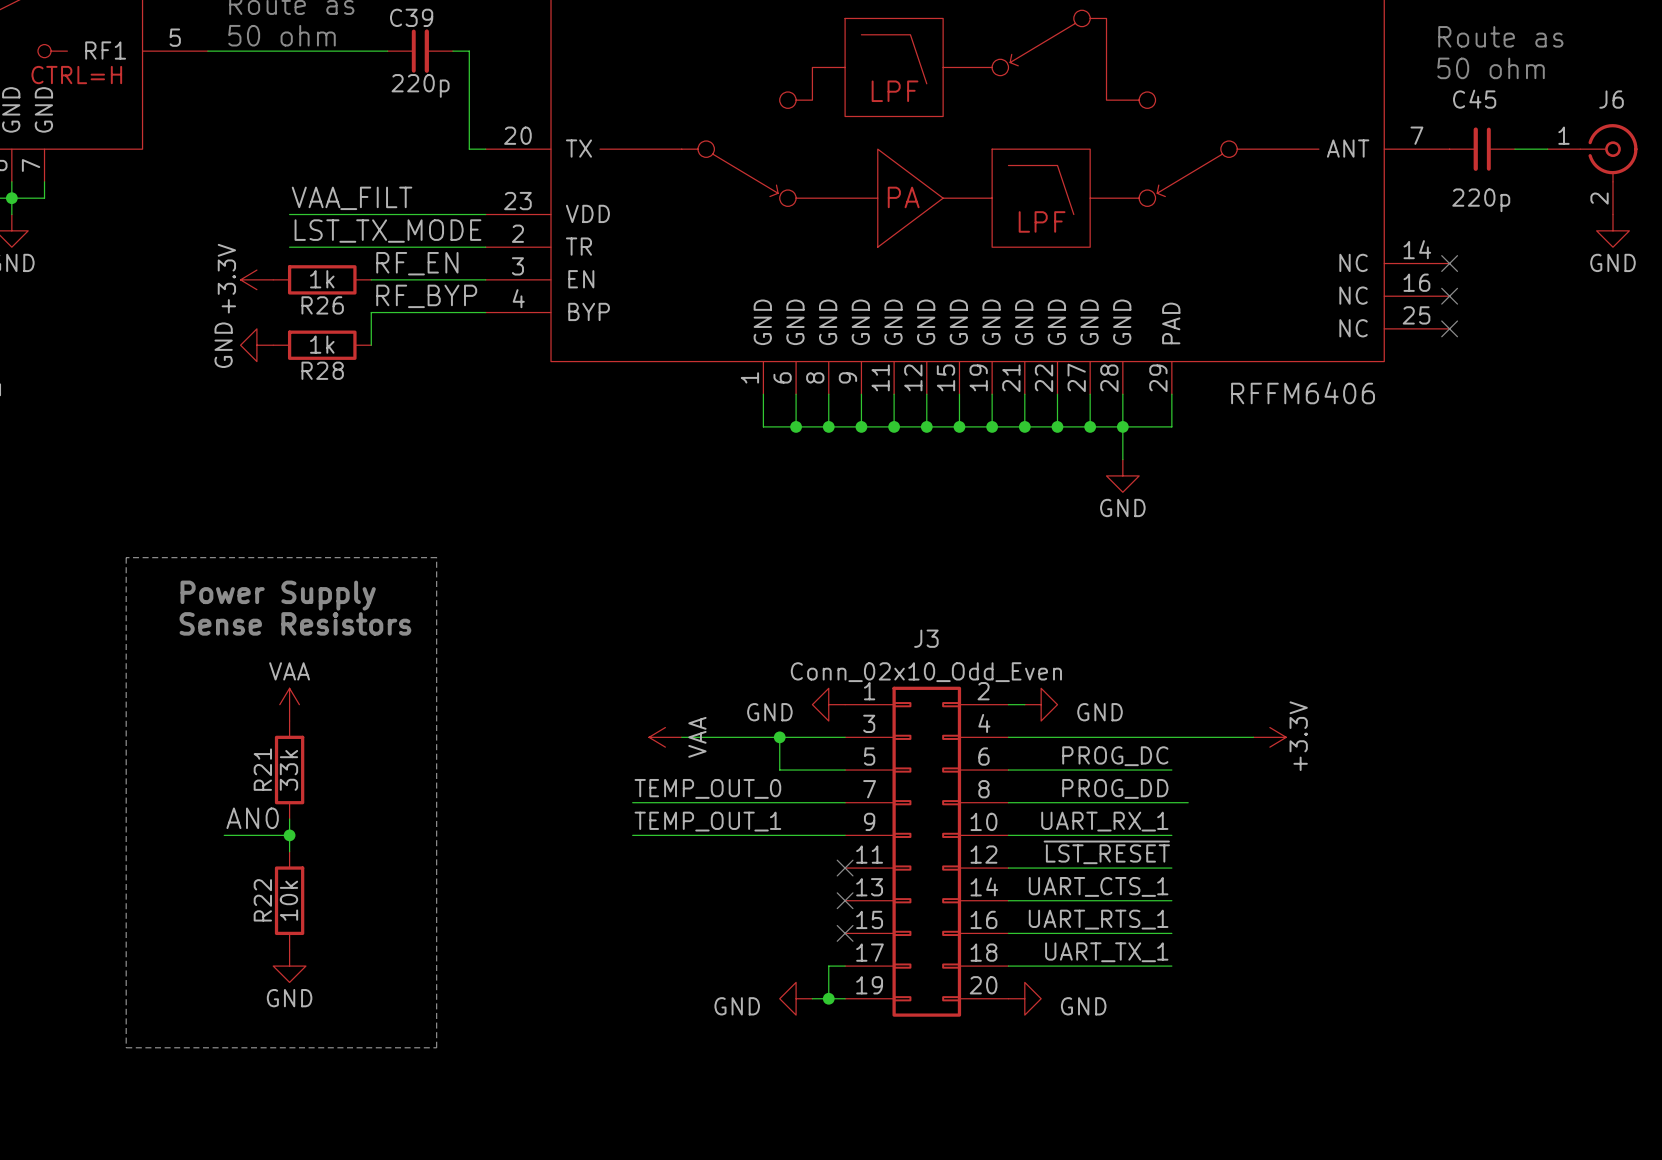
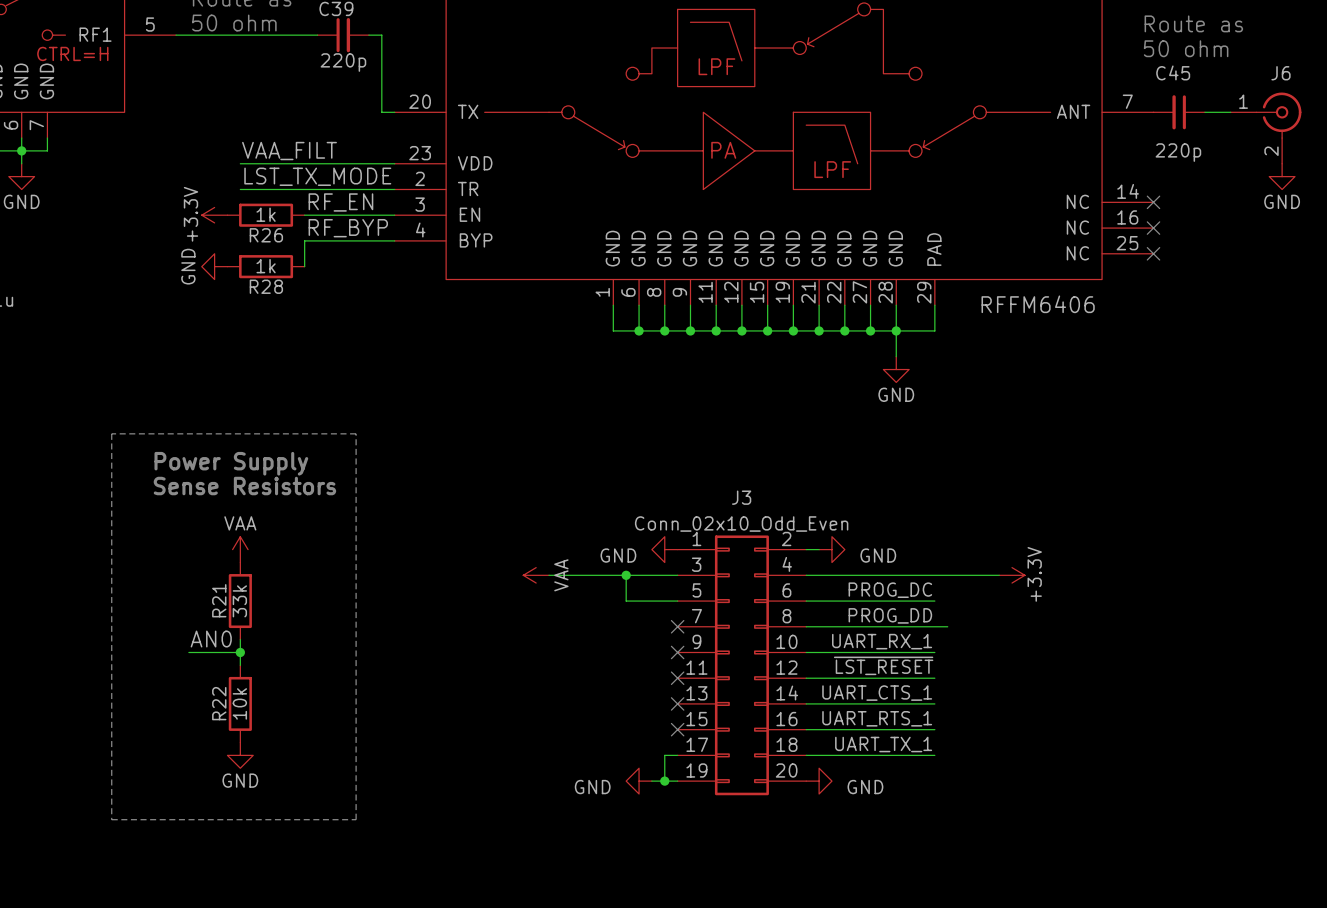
label: TEMP_OUT_0 (707, 788) -> none
wire: (632, 802) (845, 802) -> none
no-connect mark: none -> (677, 626)
label: TEMP_OUT_1 (707, 821) -> none
wire: (632, 835) (845, 835) -> none
no-connect mark: none -> (677, 652)

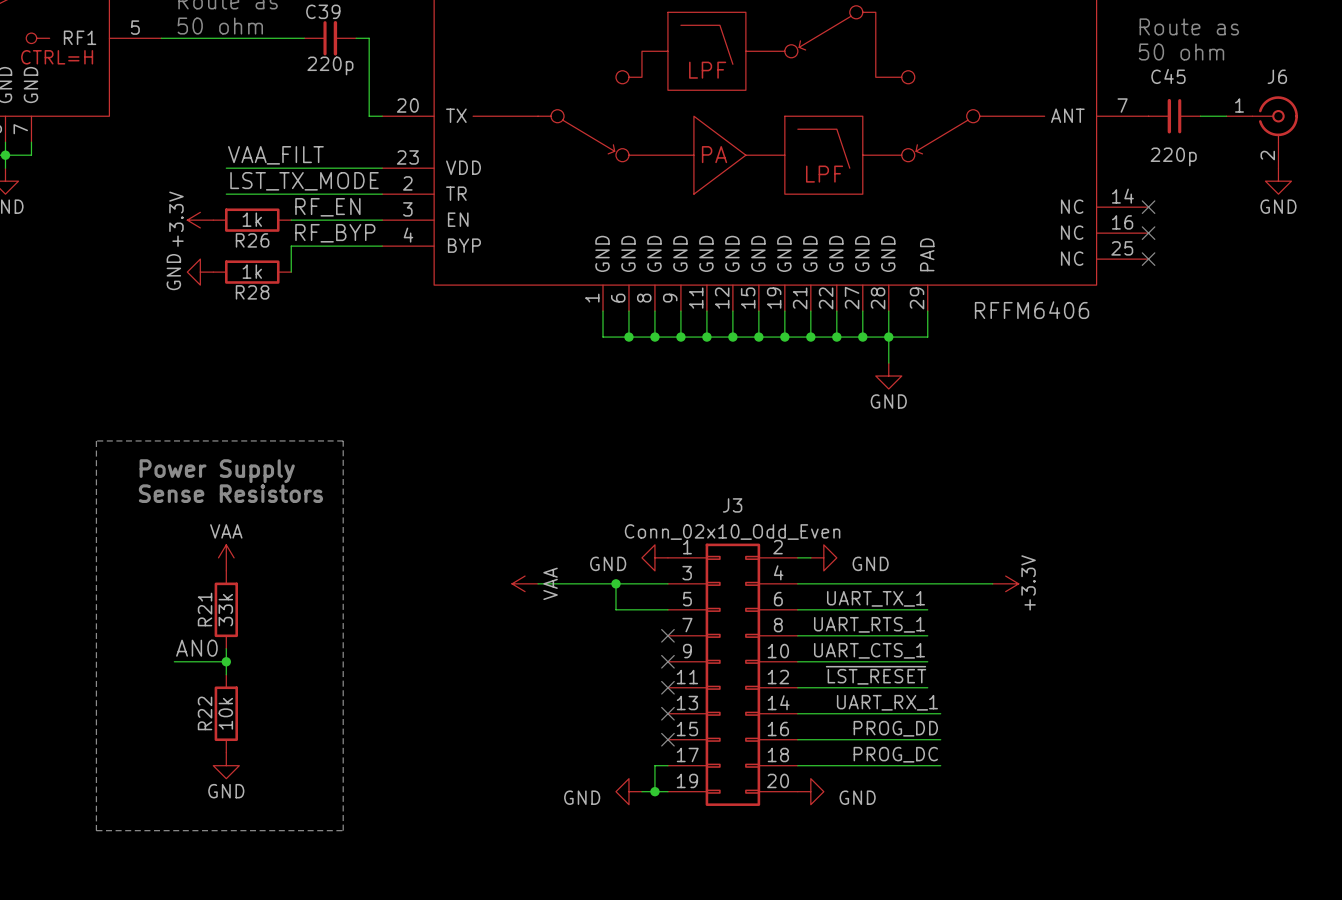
label: PROG_DC (890, 590) -> UART_TX_1 (875, 598)
label: PROG_DD (890, 615) -> UART_RTS_1 (869, 624)
wire: (934, 626) (947, 626) -> (927, 713) (940, 713)
label: UART_RX_1 (882, 641) -> UART_CTS_1 (869, 650)
label: UART_CTS_1 (877, 693) -> UART_RX_1 (887, 702)
label: UART_RTS_1 (877, 718) -> none
label: none -> PROG_DD (895, 728)
wire: none -> (927, 739) (940, 739)
label: UART_TX_1 (883, 744) -> none
label: none -> PROG_DC (895, 754)
wire: none -> (927, 765) (940, 765)

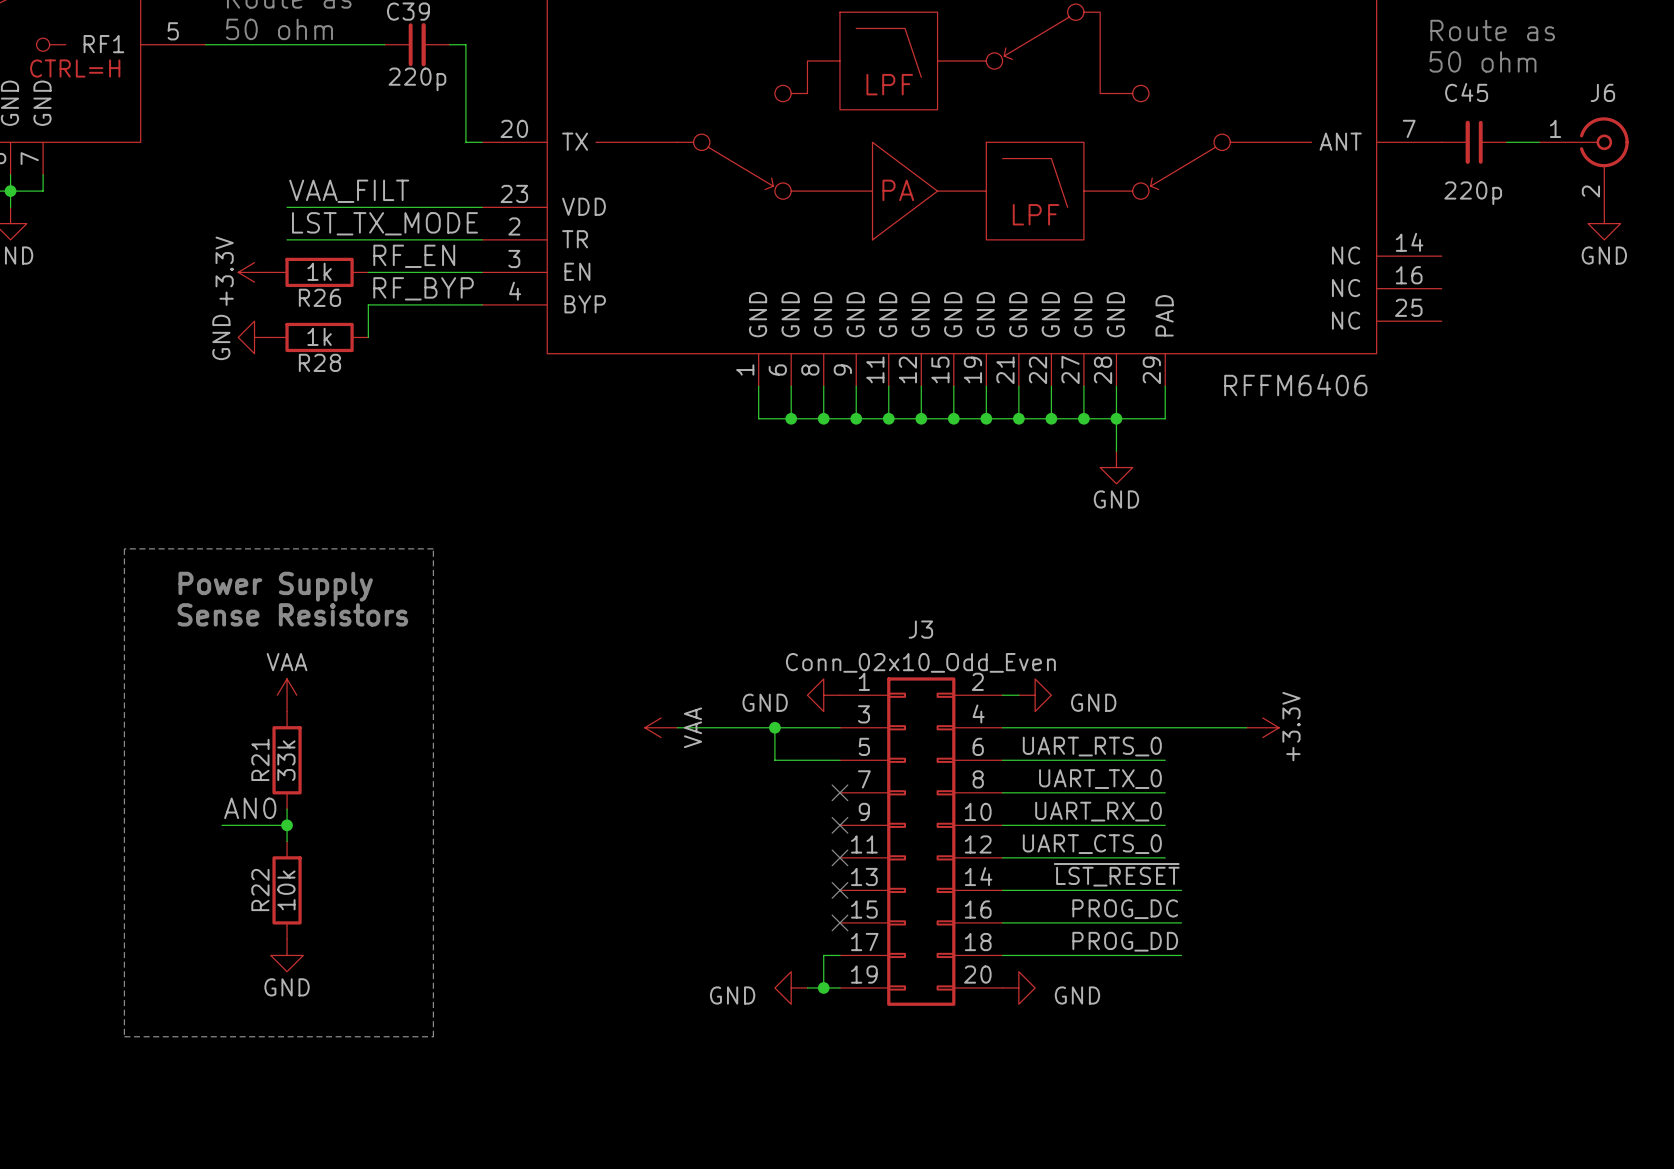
no-connect mark: (1148, 207) -> none
no-connect mark: (1148, 233) -> none
no-connect mark: (1148, 259) -> none
label: UART_TX_1 (875, 598) -> UART_RTS_0 (1092, 746)
label: UART_RTS_1 (869, 624) -> UART_TX_0 (1100, 779)
label: UART_CTS_1 (869, 650) -> UART_RX_0 (1098, 811)
label: ~{LST_RESET} (876, 675) -> UART_CTS_0 (1092, 844)
label: UART_RX_1 (887, 702) -> ~{LST_RESET} (1116, 874)
label: PROG_DD (895, 728) -> PROG_DC (1125, 909)
label: PROG_DC (895, 754) -> PROG_DD (1125, 941)

